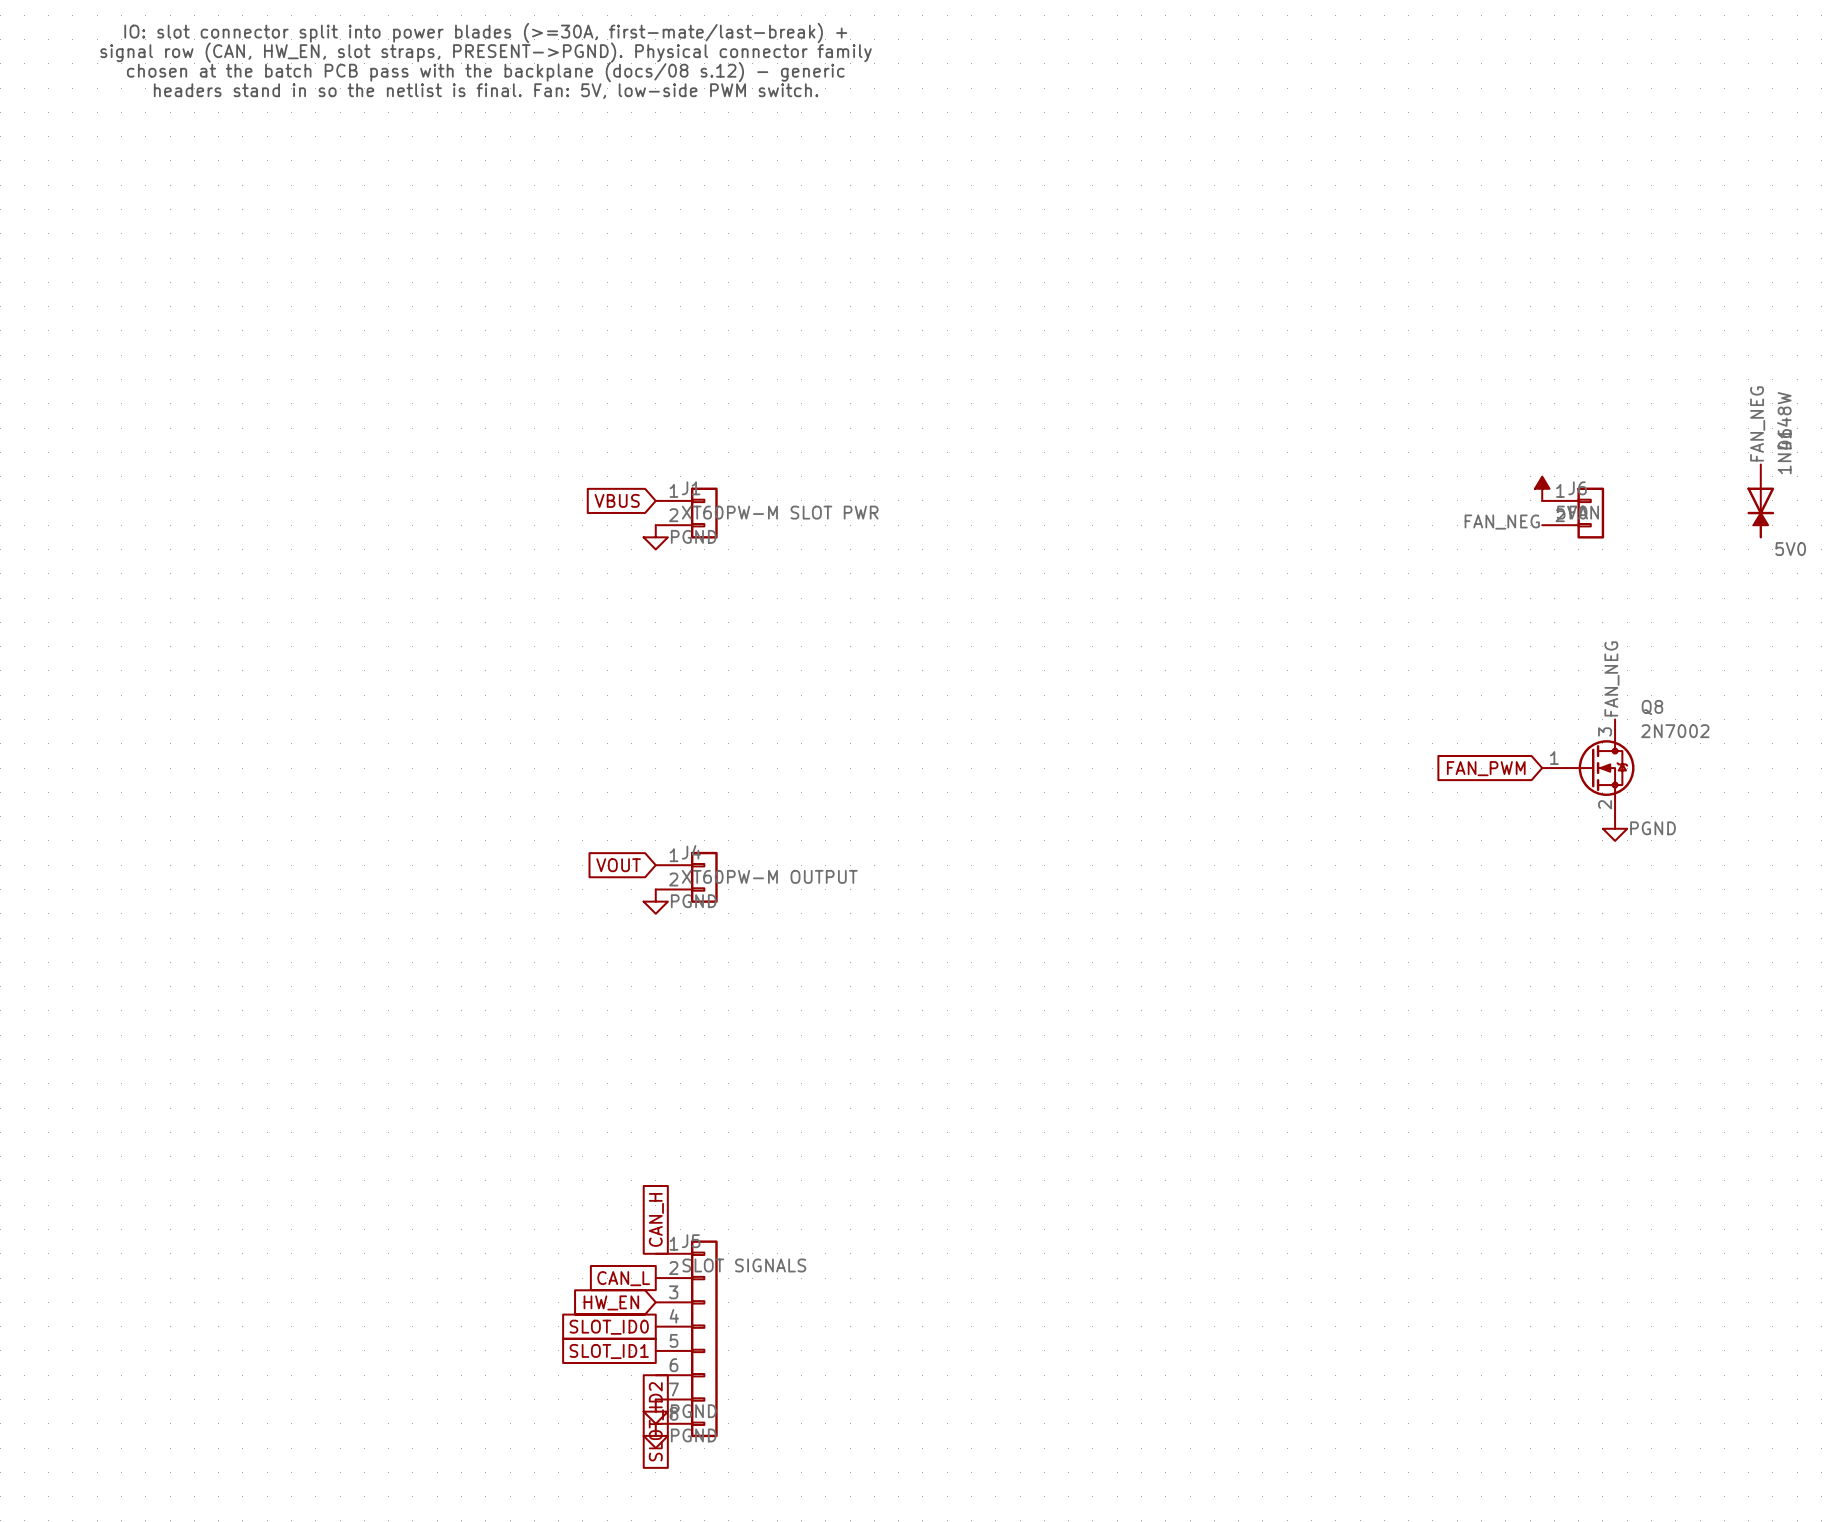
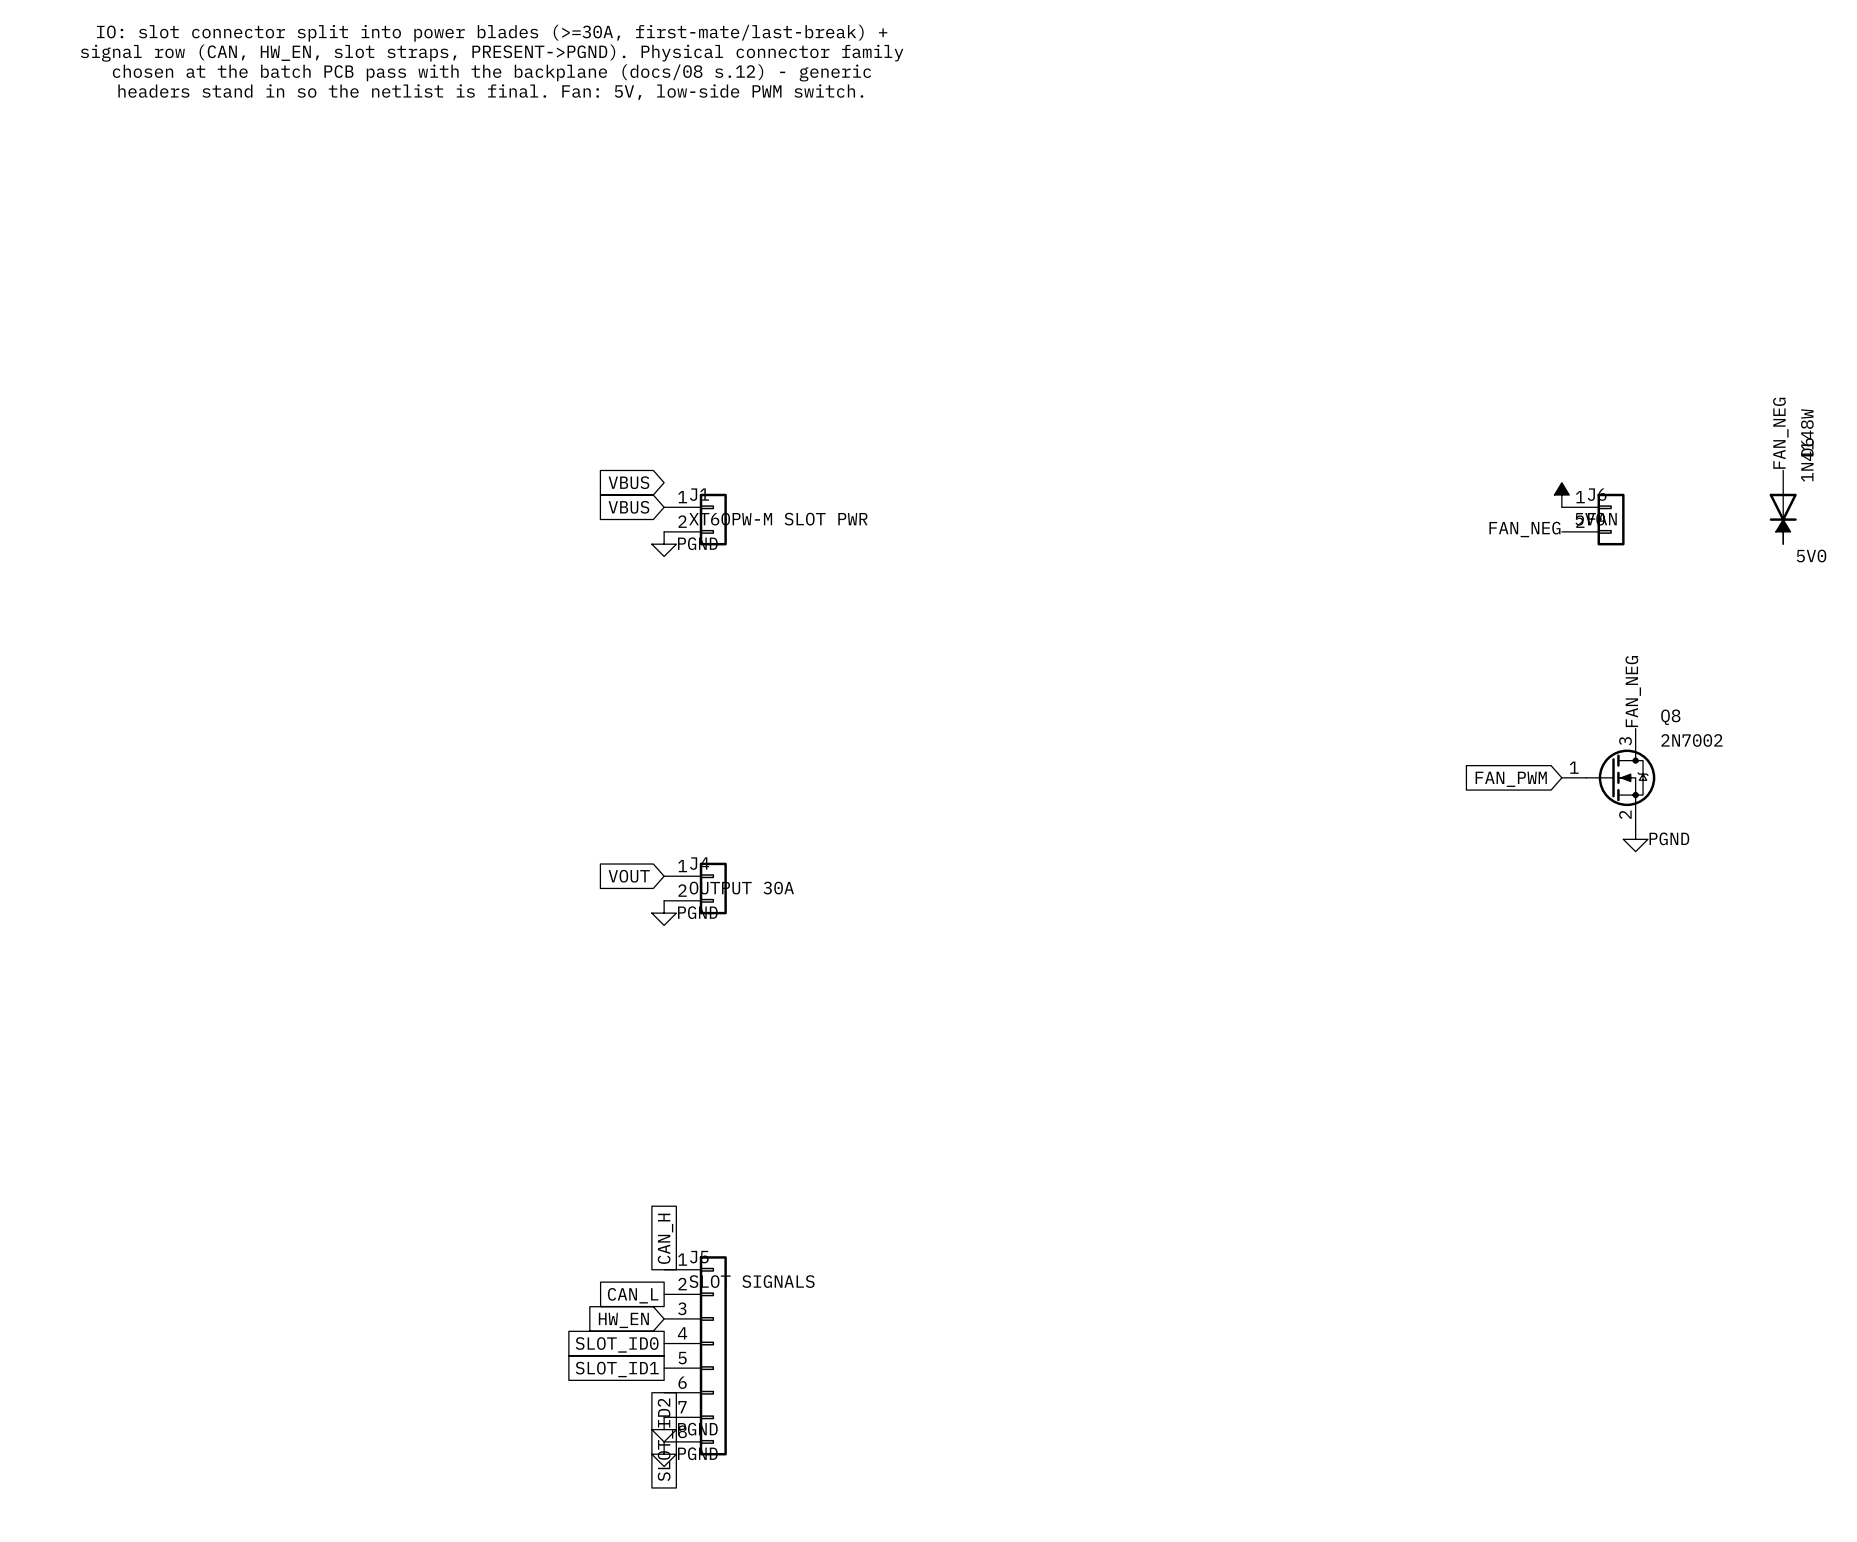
global label: none -> VBUS (628, 482)
J4 value: XT60PW-M OUTPUT (769, 876) -> OUTPUT 30A (741, 888)

